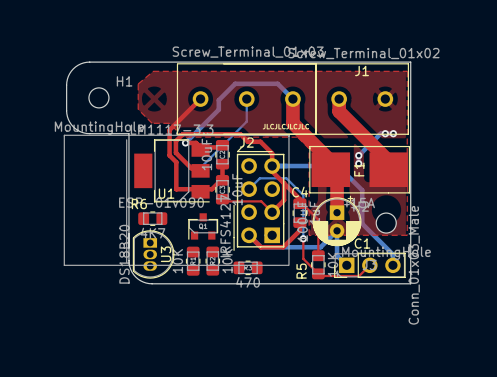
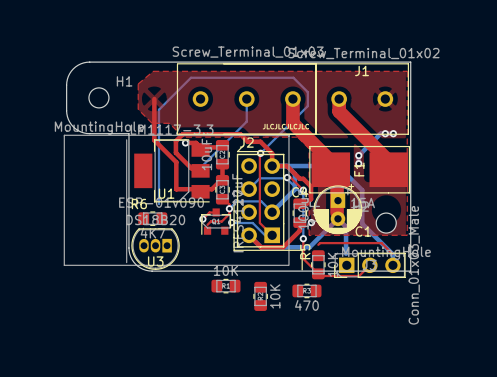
top track: (200, 99) (169, 130) (169, 155) -> (154, 99) (154, 140) (169, 155)
bottom track: (292, 99) (277, 83) (235, 83) (218, 100) (218, 109) (185, 142) -> none
top track: none -> (260, 153) (259, 223) (272, 235)
bottom track: none -> (260, 153) (307, 106) (307, 92) (293, 77) (190, 77) (159, 109) (159, 204)
via: none -> (260, 153)
top track: (272, 166) (272, 171) (299, 199) (299, 203) -> (272, 166) (287, 166) (311, 186) (311, 199) (306, 203) (302, 203)
bottom track: none -> (287, 166) (294, 173) (294, 189) (272, 212) (261, 201) (236, 201) (229, 208)
top track: none -> (287, 177) (290, 177) (302, 189)
via: none -> (287, 177)
top track: (284, 183) (284, 200) (272, 212) (261, 201) (226, 201) -> (207, 224) (210, 221) (221, 221) (229, 213) (229, 204) (226, 201)
via: none -> (303, 190)
top track: (302, 203) (318, 219) (319, 254) -> none
via: none -> (229, 208)
top track: none -> (216, 212) (209, 212) (202, 219)
via: none -> (202, 219)
C1 position: (337, 220) -> (337, 208)
bottom track: none -> (231, 222) (252, 223) (265, 235)
via: none -> (231, 222)
via: none -> (311, 222)
part position: (203, 226) -> (216, 221)
top track: none -> (318, 244) (320, 243) (381, 243) (392, 253)
bottom track: (309, 247) (320, 247) (337, 230) (337, 255) (346, 265) -> (309, 247) (337, 218) (346, 226) (346, 253)
board edge: (128, 248) (129, 263) (132, 272) (140, 280) (149, 283) (410, 283) (410, 271) -> (128, 248) (133, 262) (140, 268) (149, 270) (410, 271)
line: none -> (234, 250) (302, 250) (302, 269)
U3 rotation: 0° (153, 254) -> 90° clockwise (155, 249)
part rotation: 0° (193, 261) -> 90° clockwise (225, 286)
part position: (193, 261) -> (225, 286)
part position: (212, 261) -> (260, 296)
part position: (248, 267) -> (306, 290)
R5 name position: R5 (301, 271) -> R5 (305, 251)

